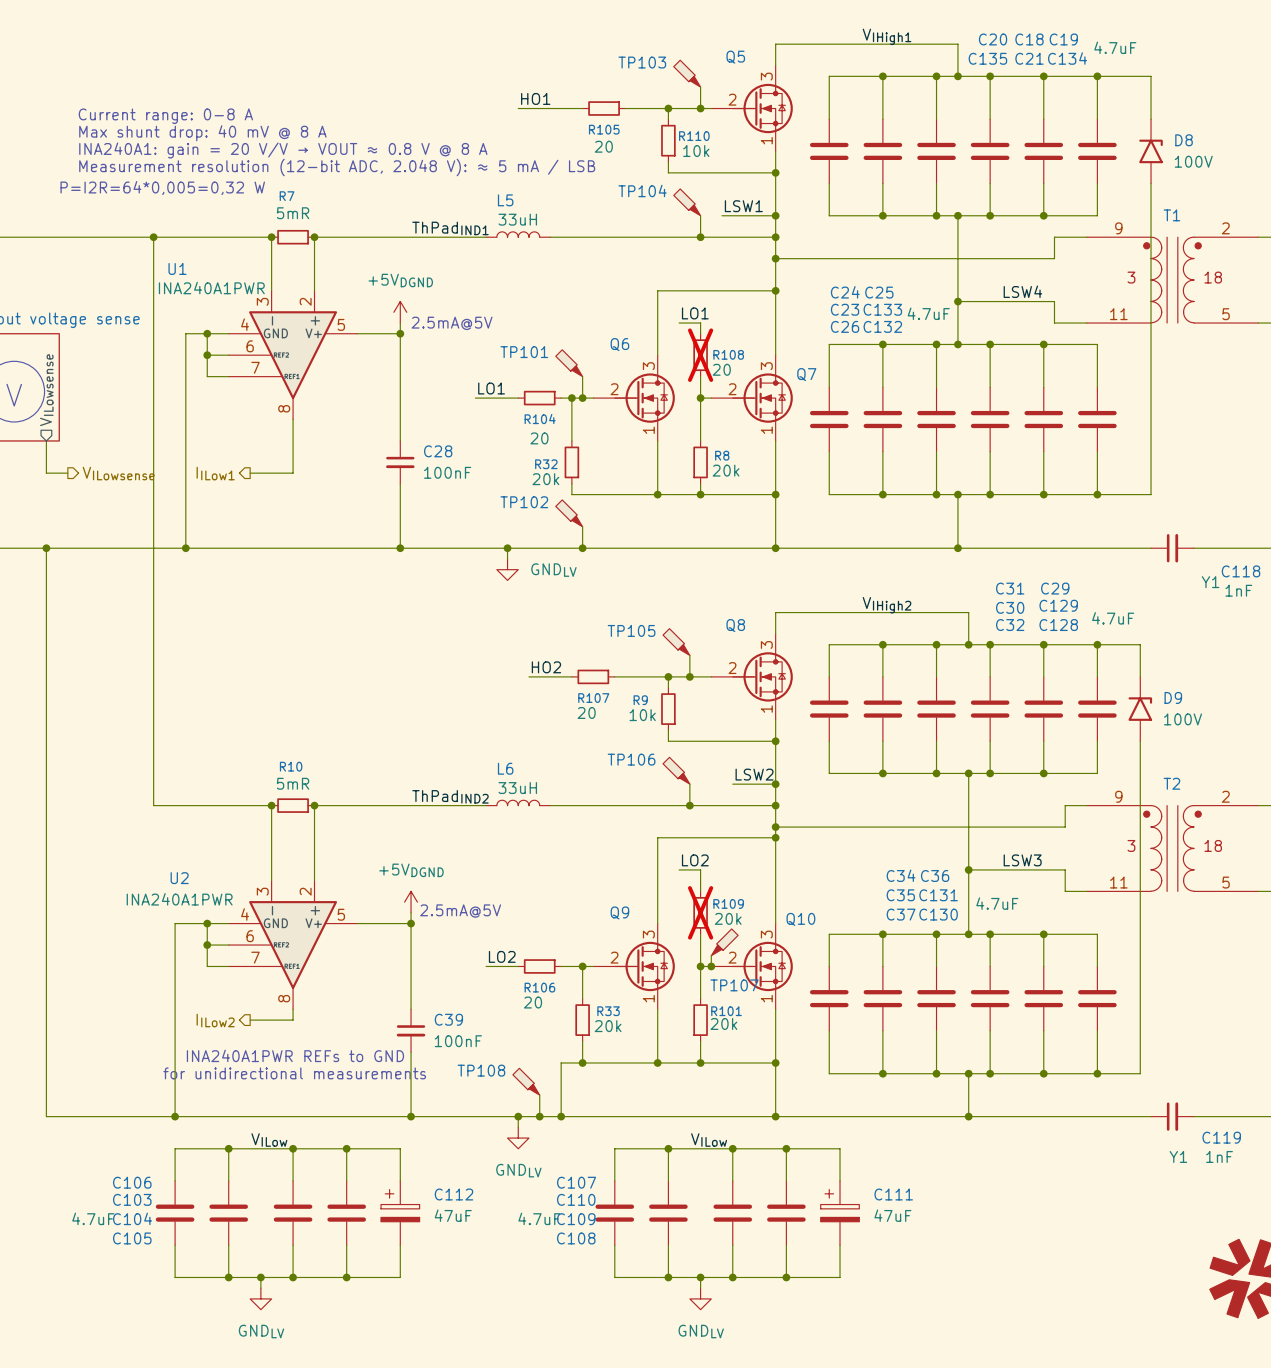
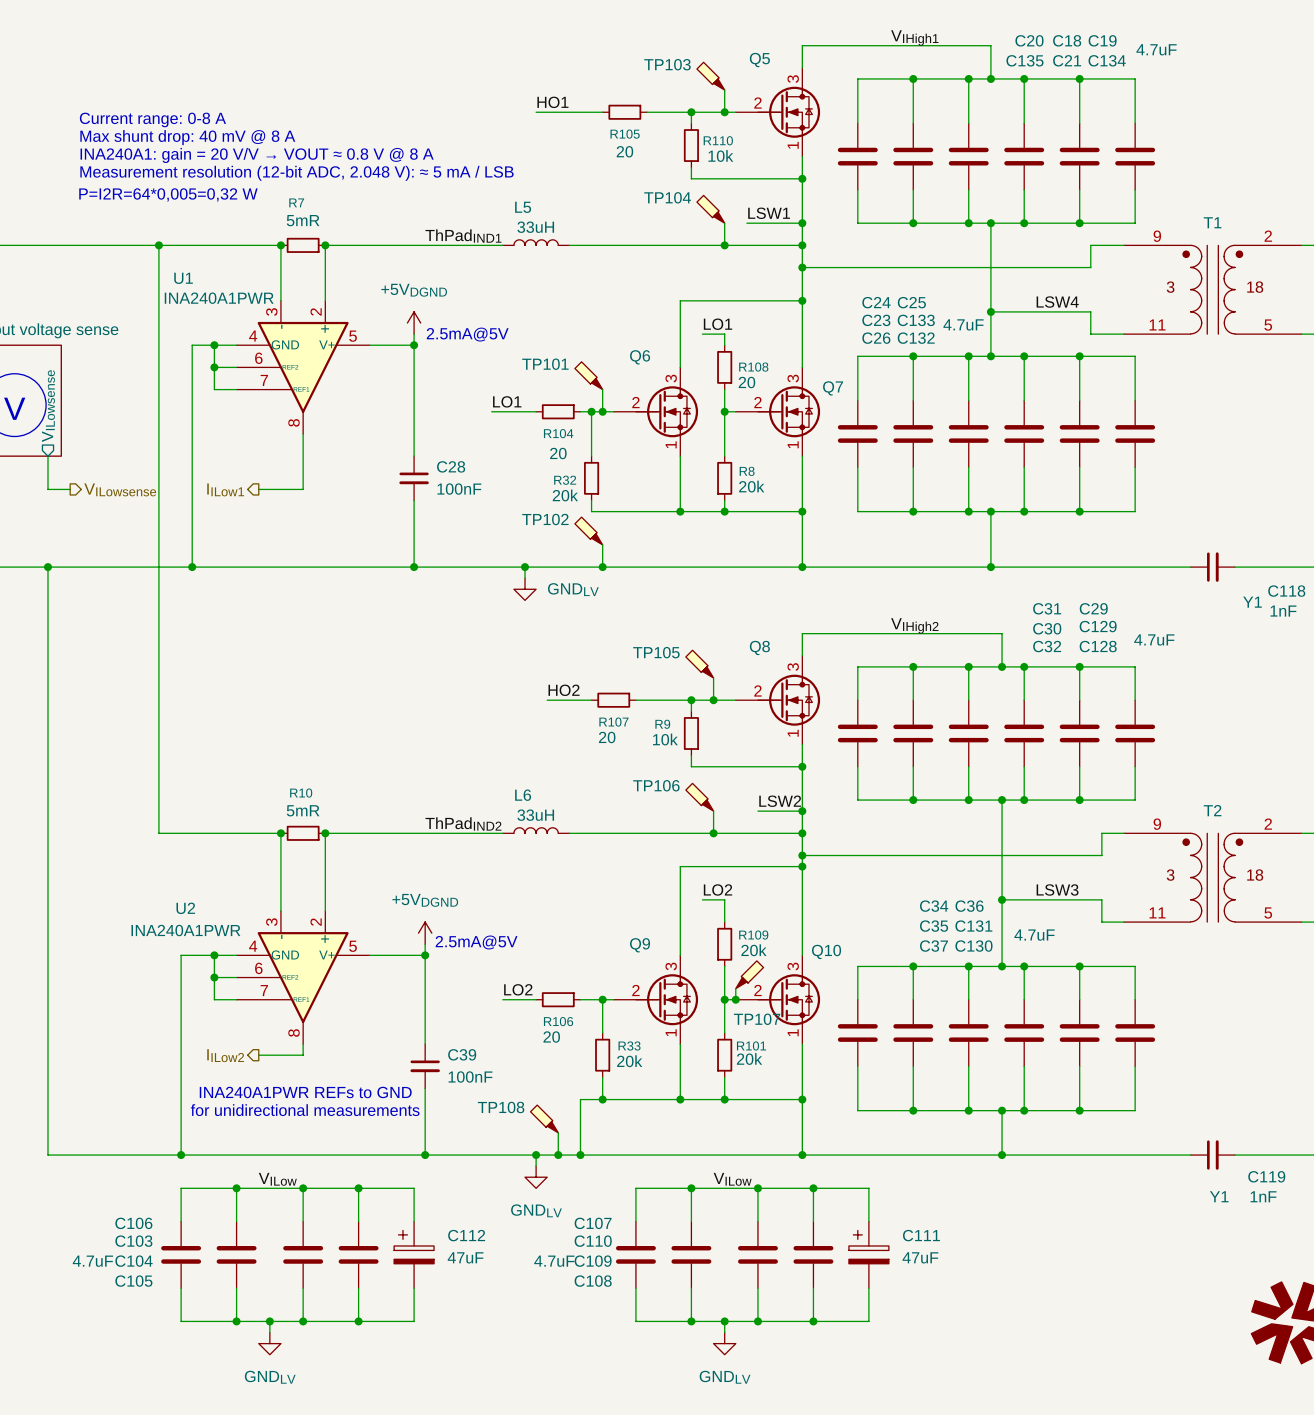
wire: (1097, 76) (1151, 76) (1151, 119) -> none
junction: (1097, 76) -> none
D8: 100V (1151, 151) -> none
wire: (1151, 183) (1151, 494) (1097, 494) -> none
R108 do-not-place cross: (700, 355) -> none
junction: (1097, 494) -> none
wire: (1097, 644) (1140, 644) (1140, 676) -> none
junction: (1097, 644) -> none
D9: 100V (1140, 709) -> none
wire: (1140, 741) (1140, 1073) (1097, 1073) -> none
R109 do-not-place cross: (700, 912) -> none
junction: (1097, 1073) -> none

